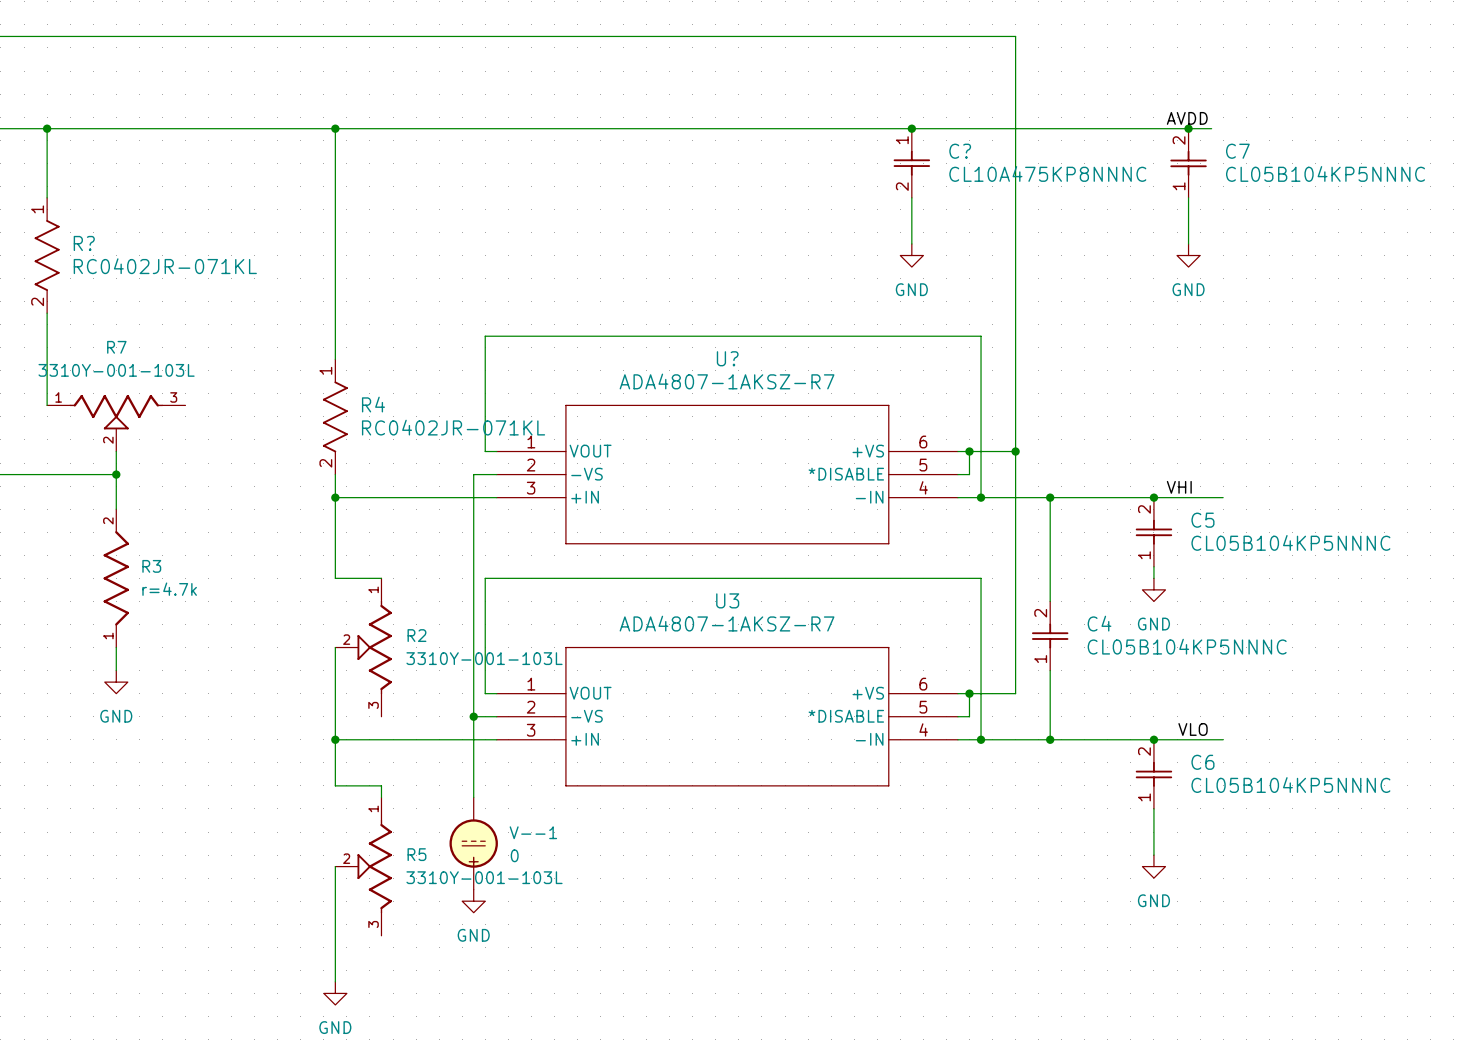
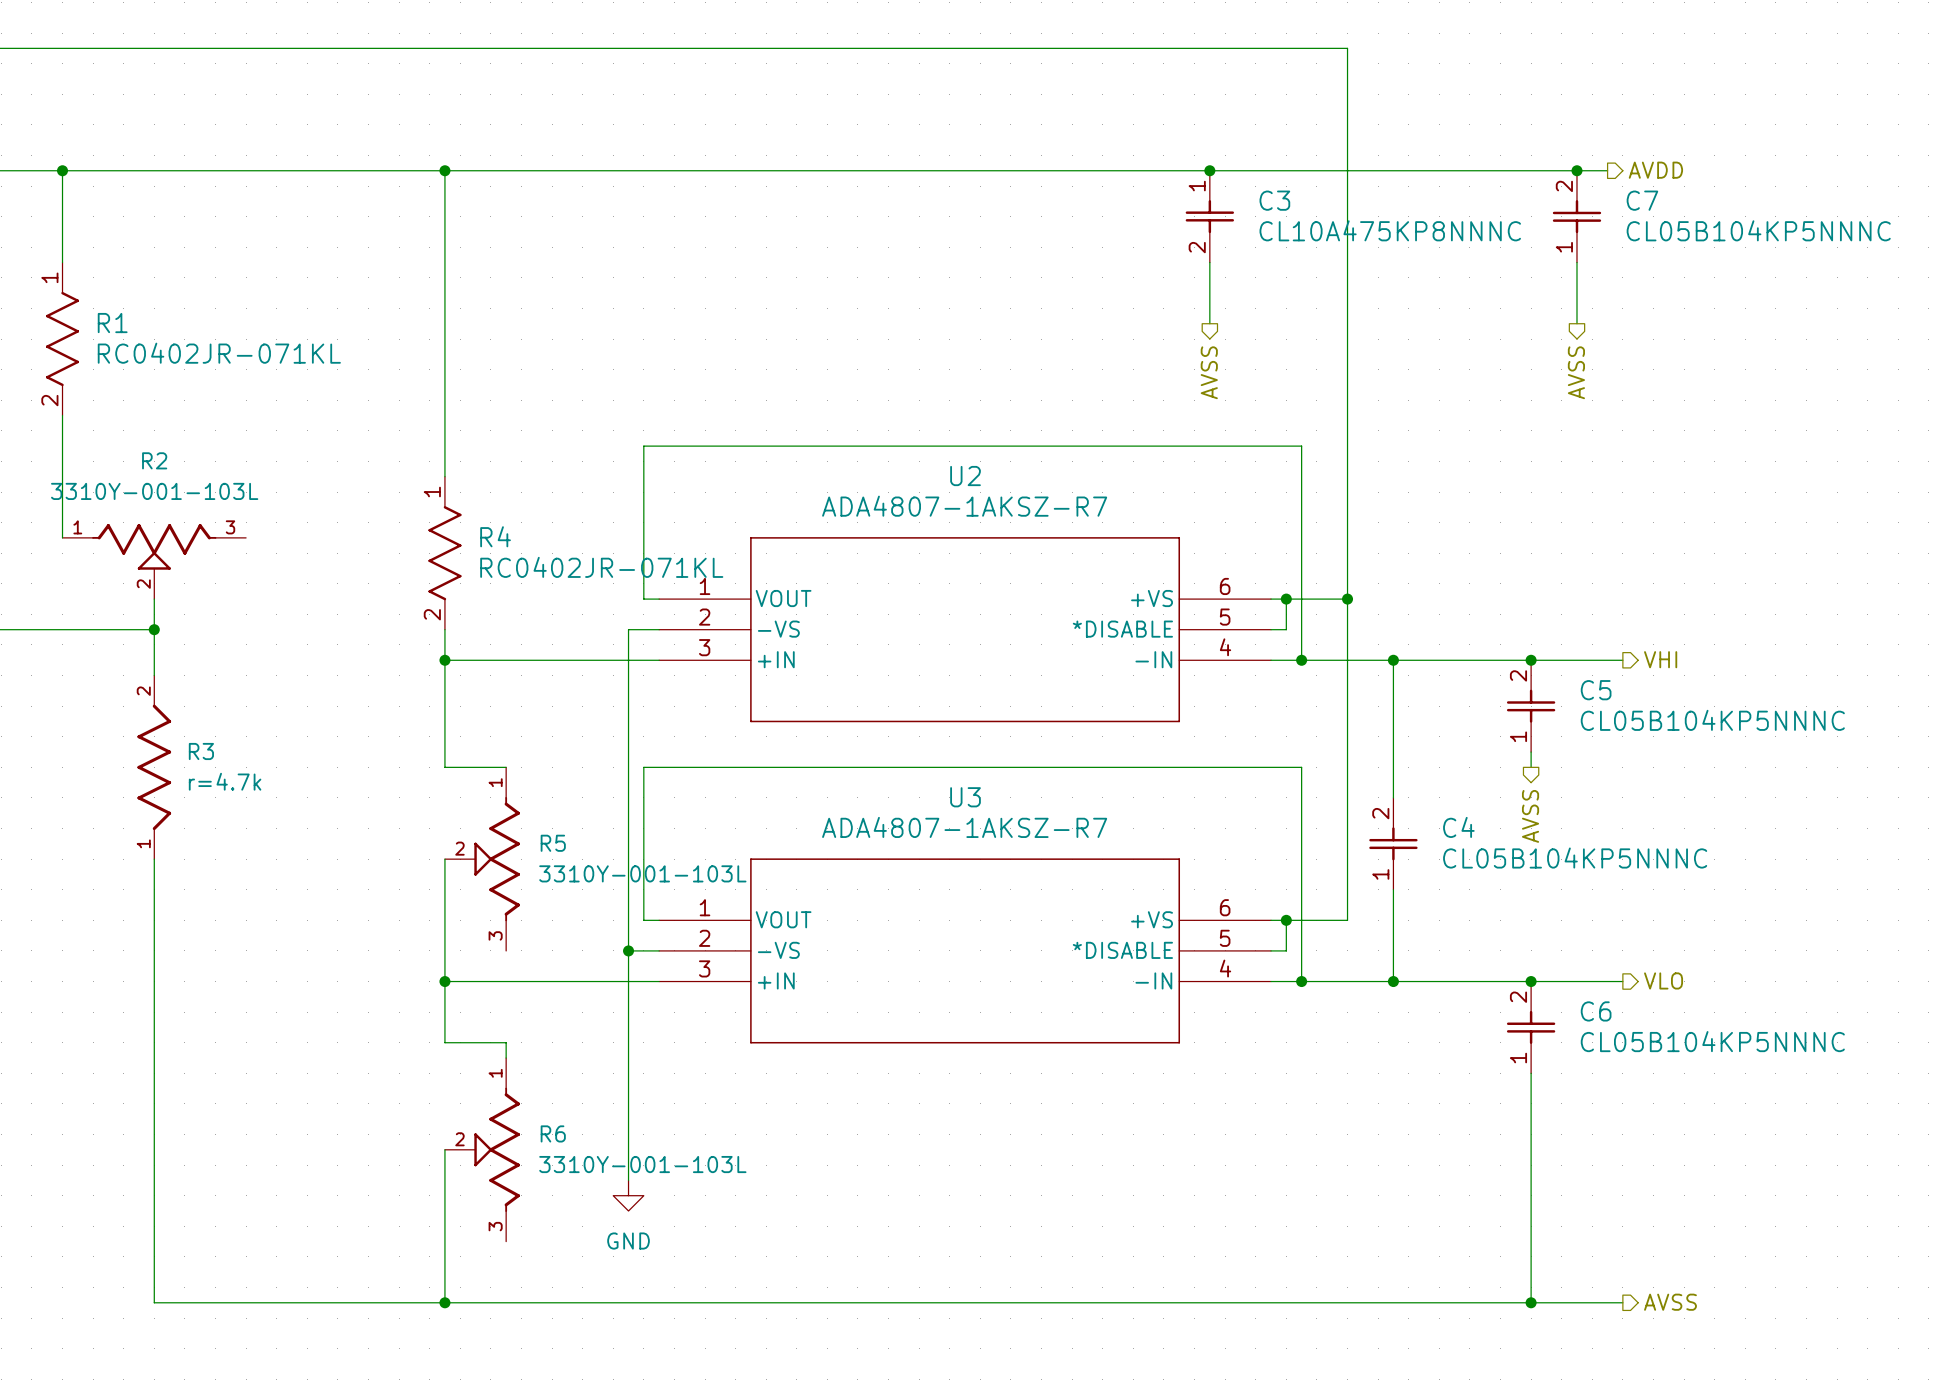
label: AVDD (1187, 118) -> none
hierarchical label: none -> AVDD (1655, 170)
C? name: C? (960, 151) -> C3 (1274, 200)
R? name: R? (84, 243) -> R1 (112, 323)
power symbol: GND (911, 255) -> none
power symbol: GND (1188, 255) -> none
hierarchical label: none -> AVSS (1209, 372)
hierarchical label: none -> AVSS (1576, 372)
R7 name: R7 (116, 347) -> R2 (154, 460)
U? name: U? (727, 358) -> U2 (965, 476)
label: VHI (1179, 487) -> none
hierarchical label: none -> VHI (1660, 659)
power symbol: GND (1153, 589) -> none
hierarchical label: none -> AVSS (1530, 816)
R2 name: R2 (416, 635) -> R5 (553, 843)
wire: none -> (154, 889) (154, 1302) (1622, 1302)
power symbol: GND (116, 682) -> none
label: VLO (1193, 729) -> none
hierarchical label: none -> VLO (1663, 980)
V--1: 0 (473, 843) -> none
R5 name: R5 (416, 854) -> R6 (553, 1133)
wire: none -> (1531, 1134) (1531, 1302)
power symbol: GND (1153, 866) -> none
junction: none -> (444, 1302)
junction: none -> (1531, 1302)
hierarchical label: none -> AVSS (1670, 1302)
power symbol: GND (335, 993) -> none

